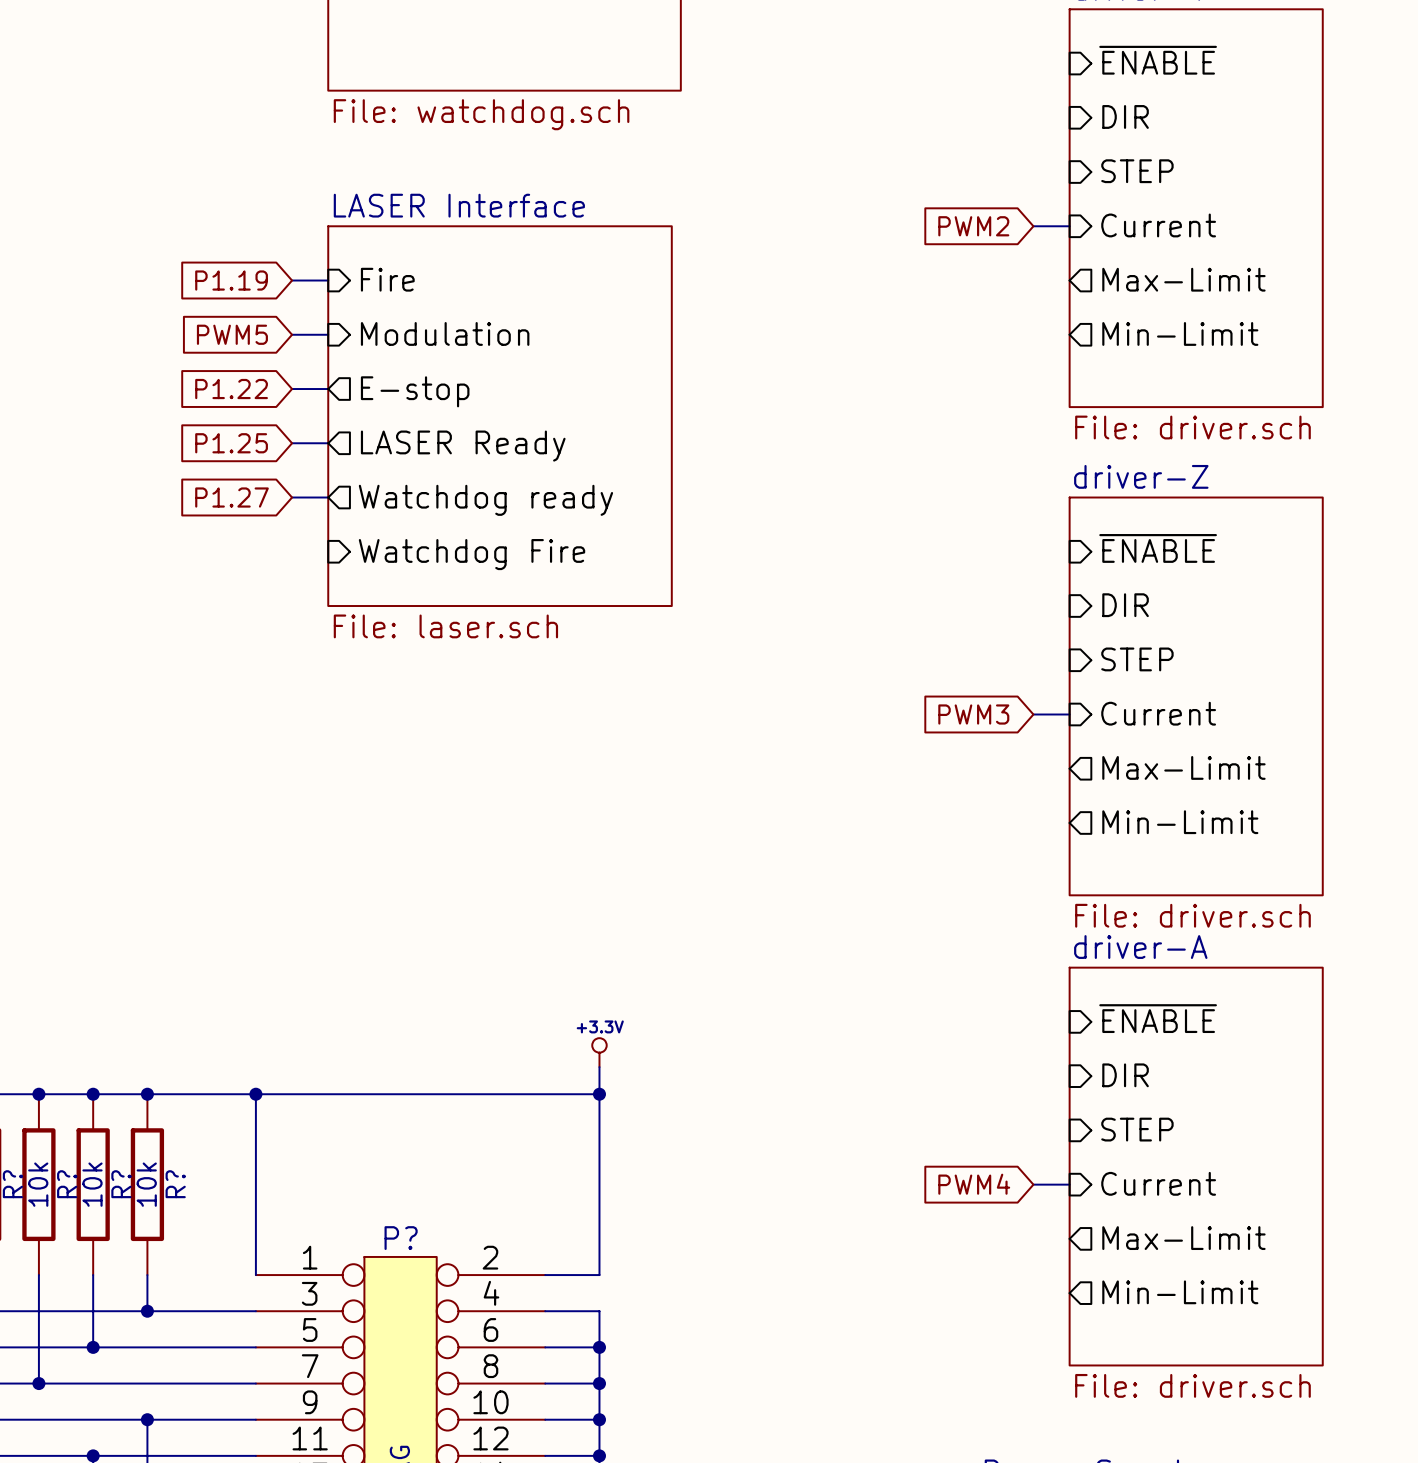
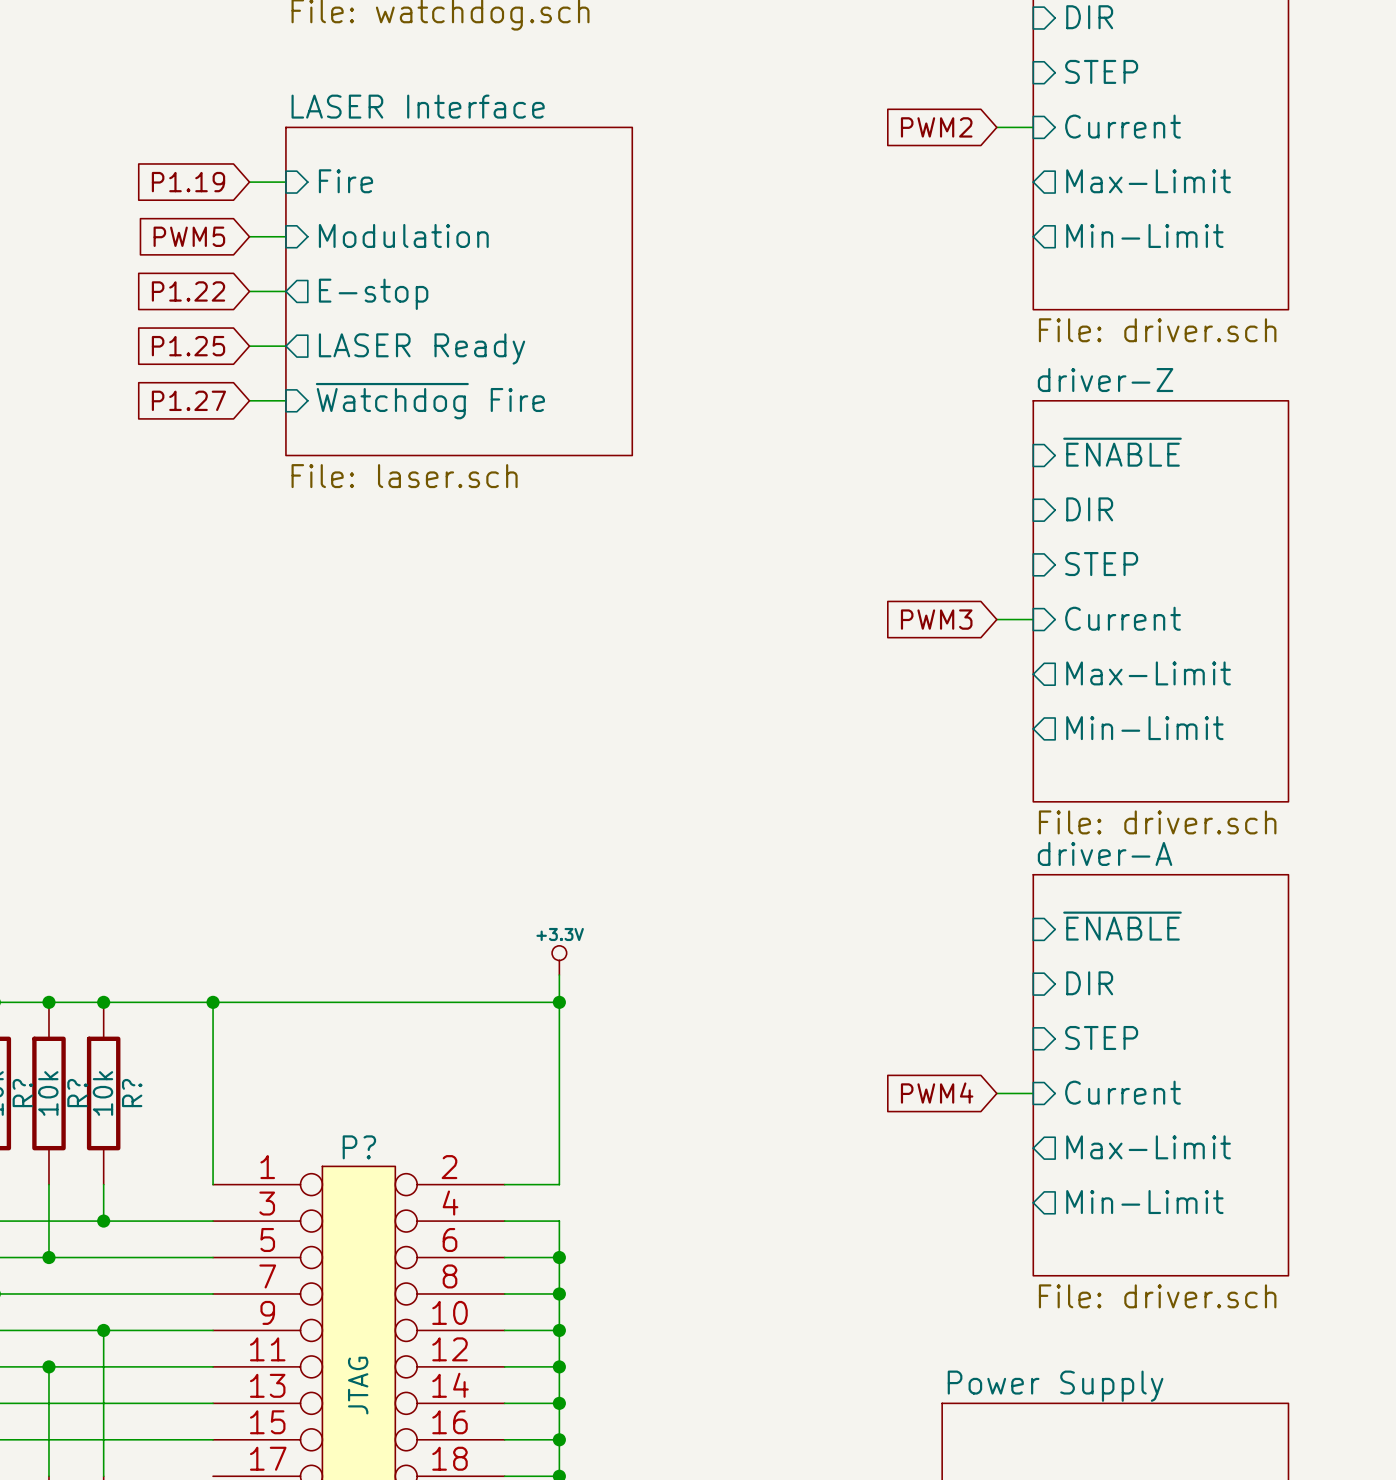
sheet LASER Interface: none -> File: laser.sch (459, 291)
sheet LASER Interface: File: laser.sch (500, 416) -> none
sheet pin shape: output (485, 500) -> input (430, 401)
sheet pin: Watchdog ready (485, 500) -> ~{Watchdog} Fire (430, 401)
sheet pin: Watchdog Fire (472, 554) -> none

